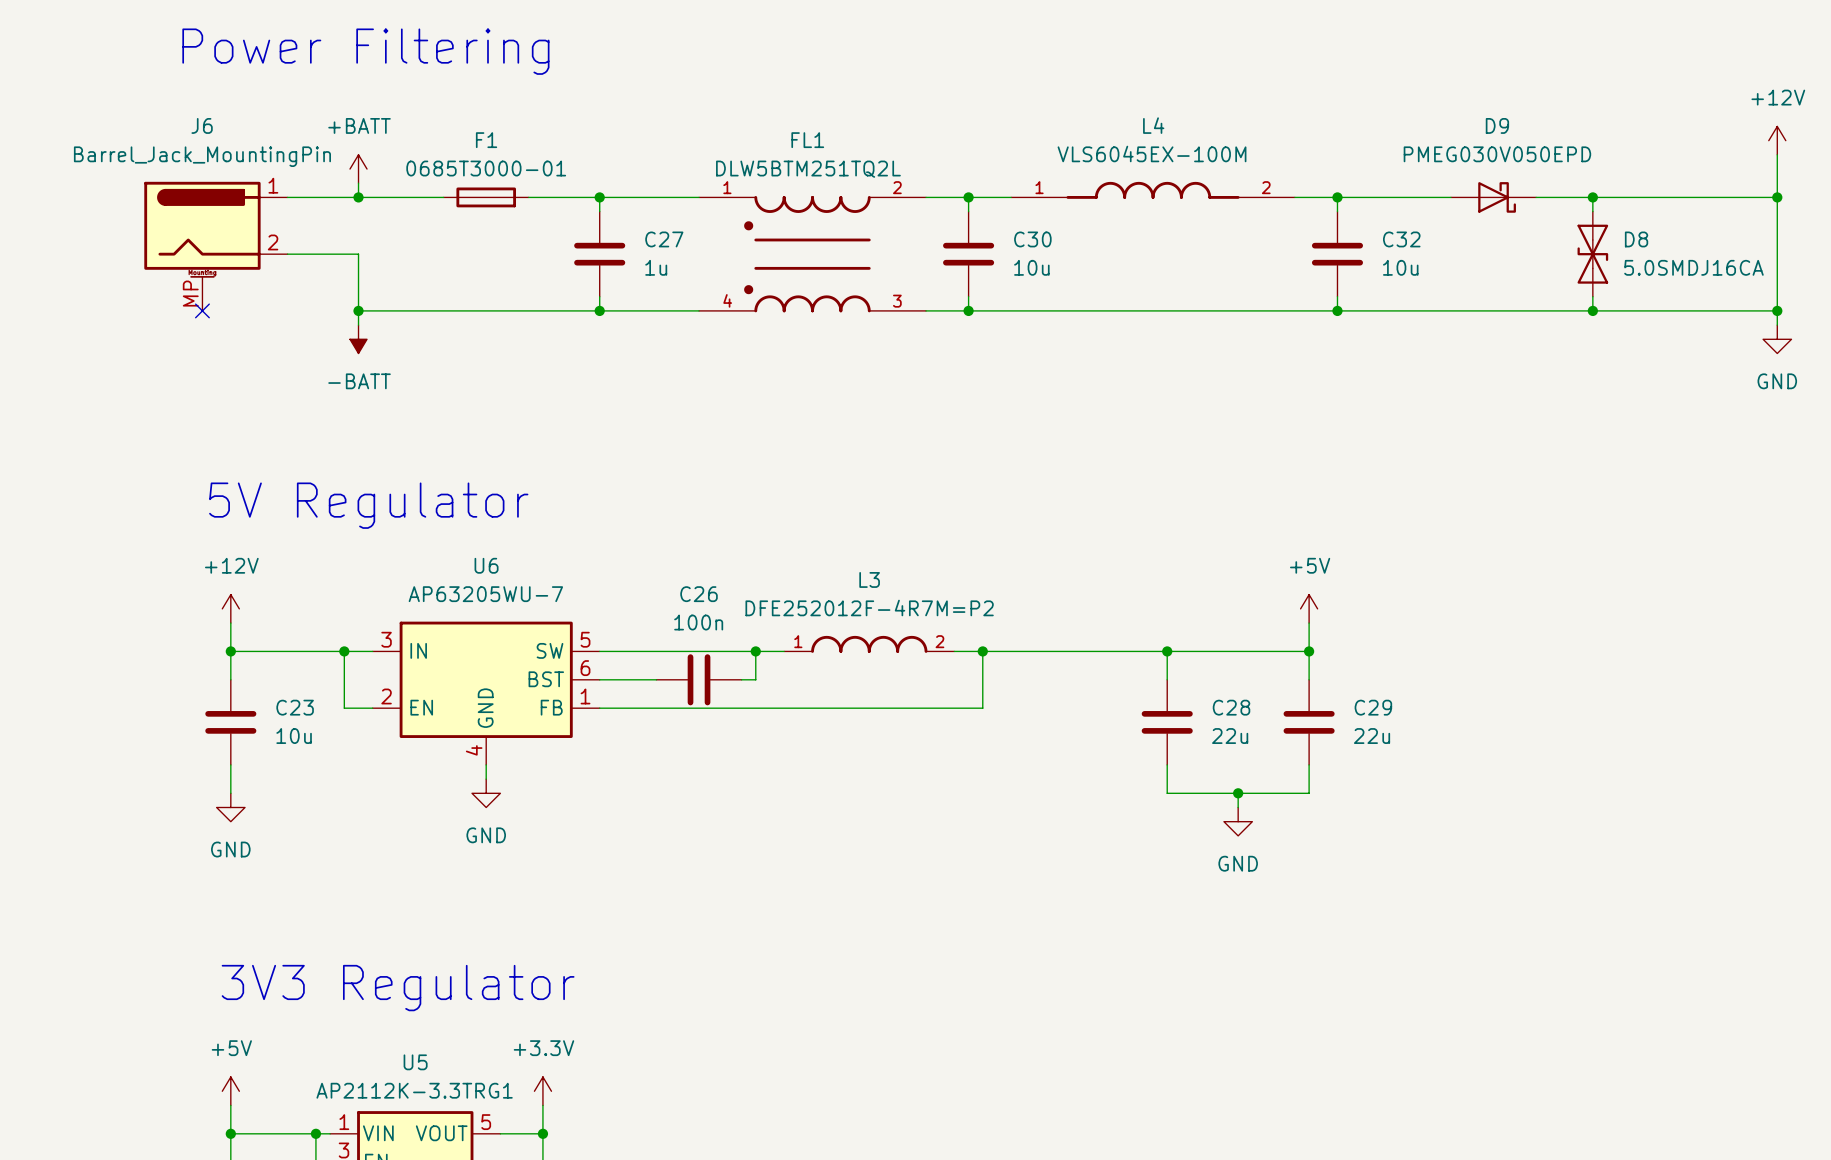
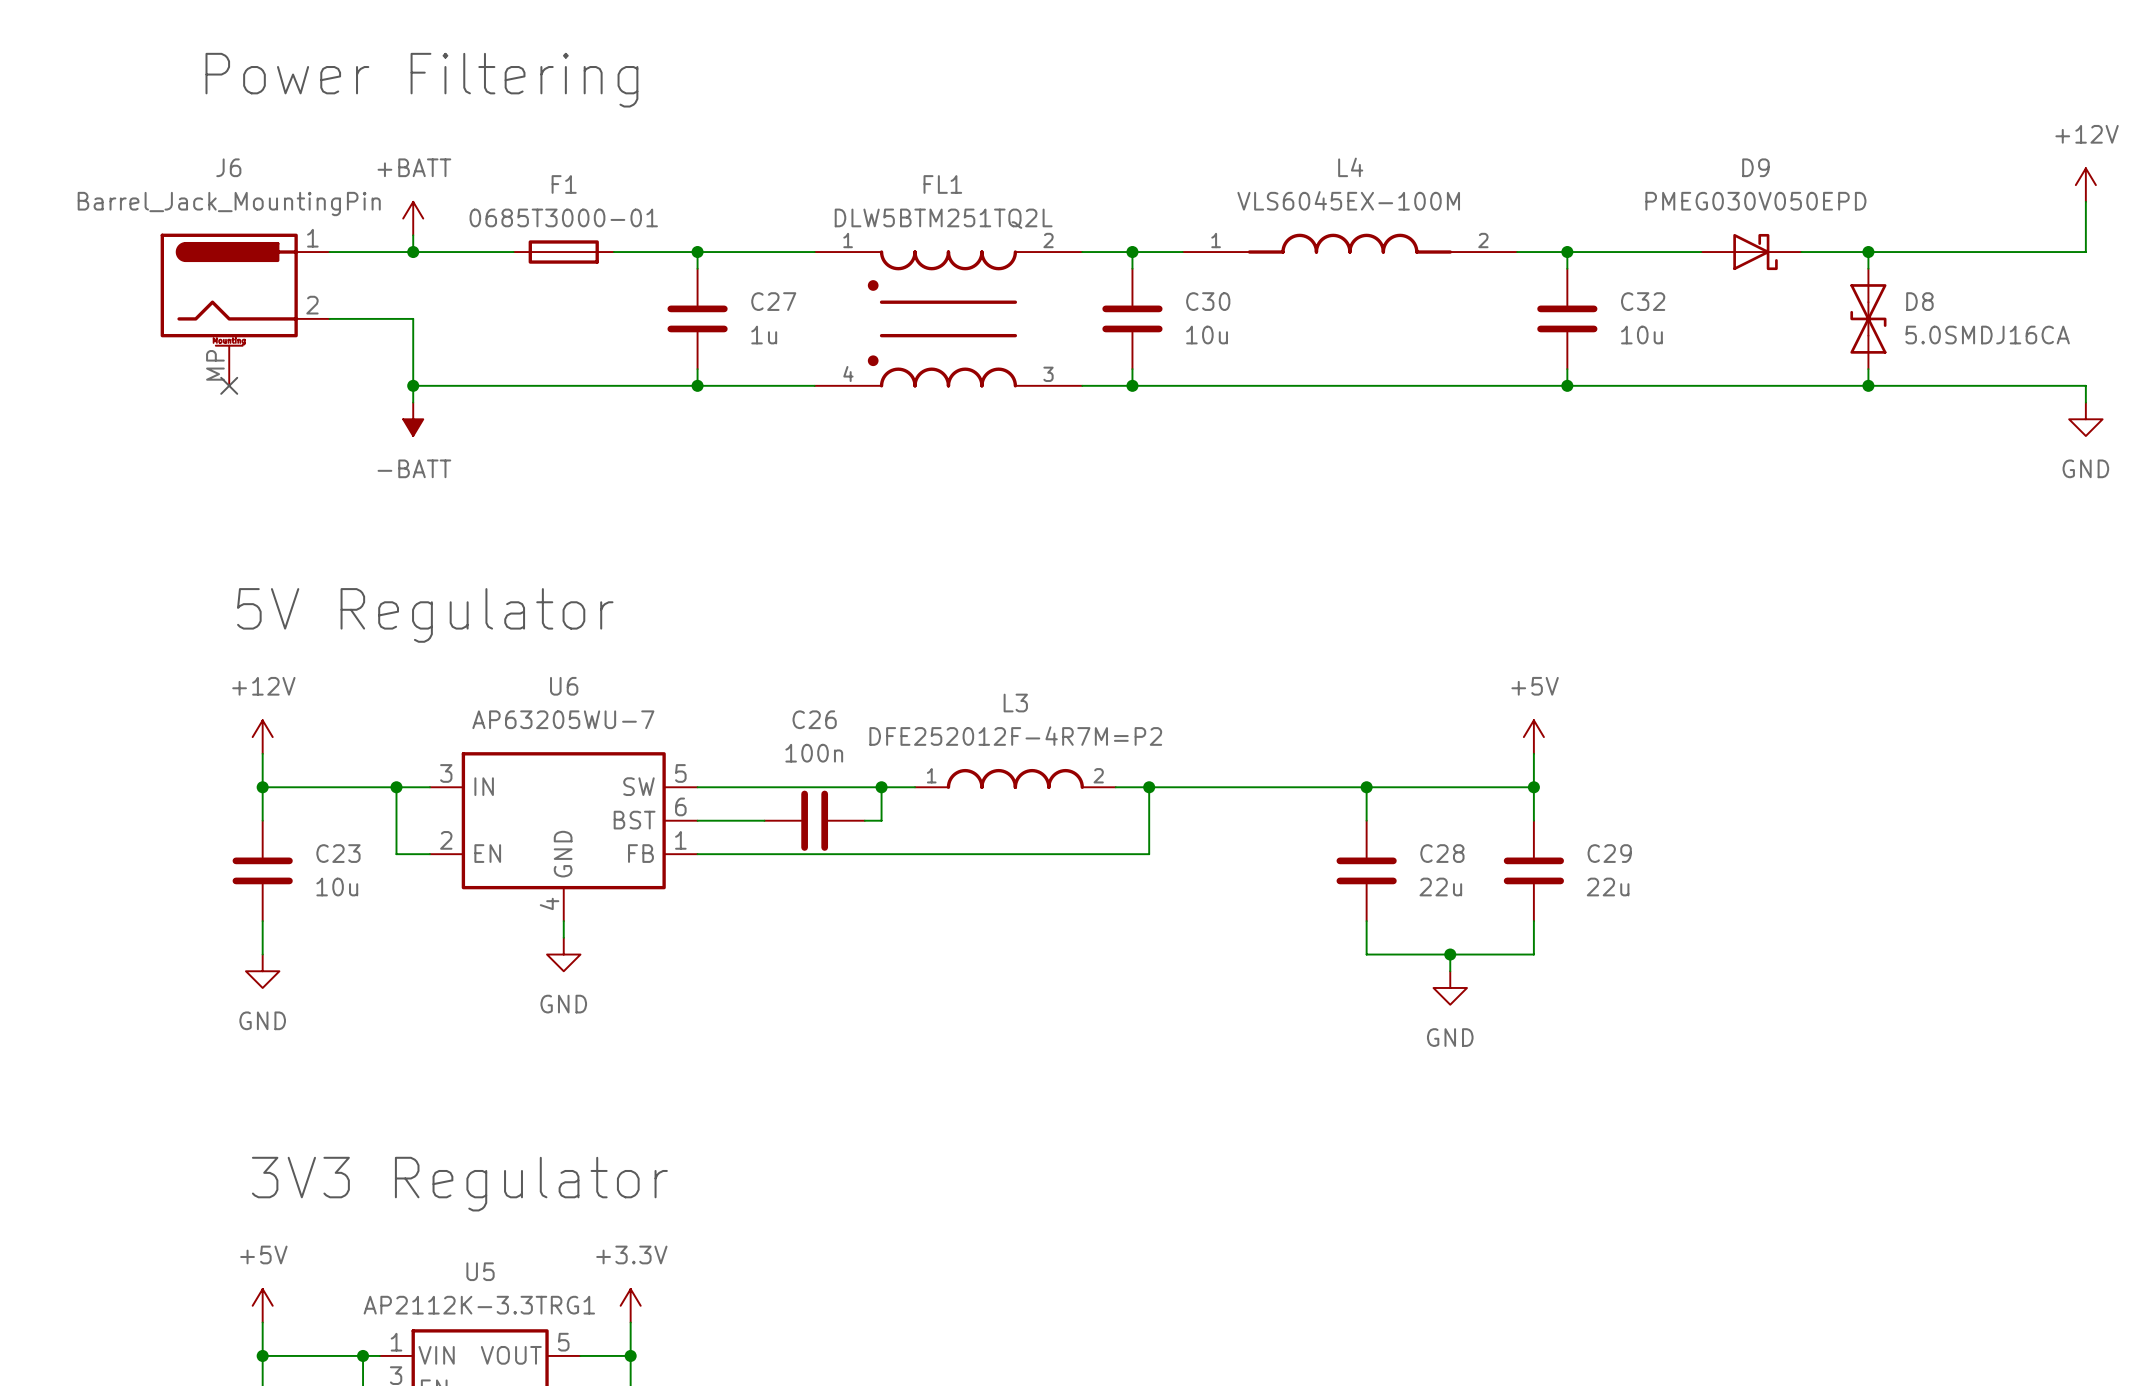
wire: (1777, 197) (1777, 310) -> none
junction: (1777, 197) -> none
junction: (1777, 310) -> none

